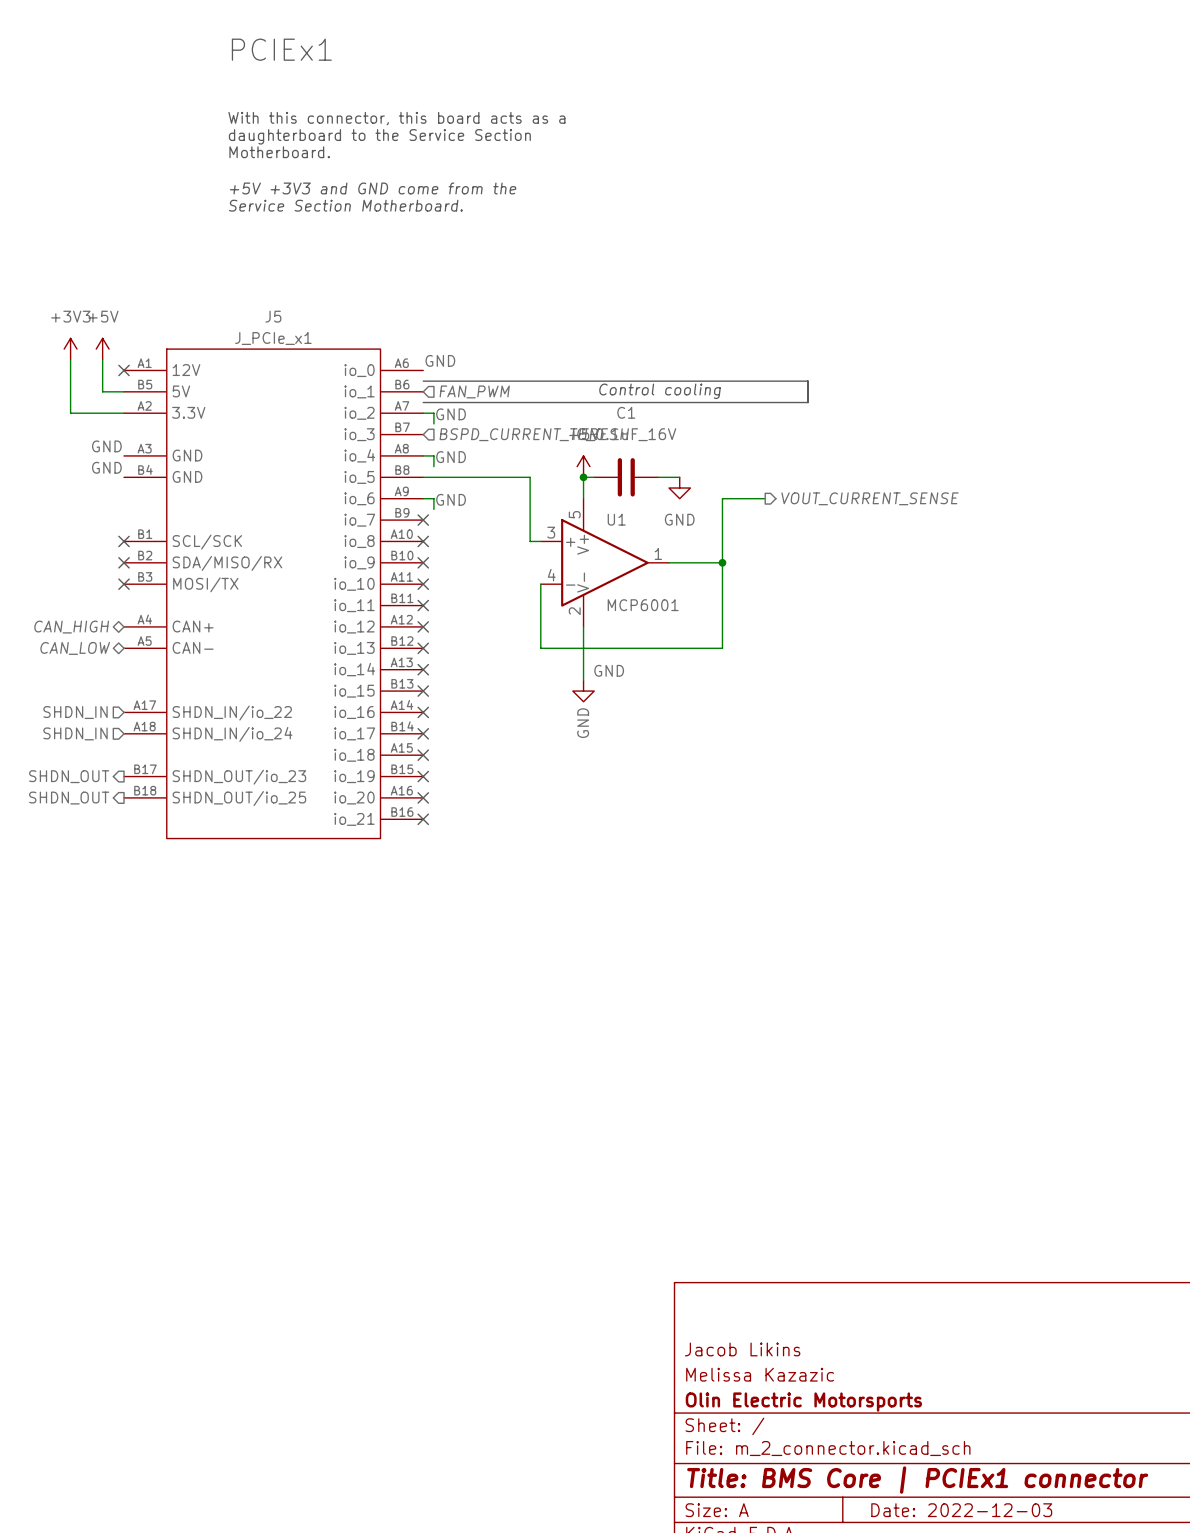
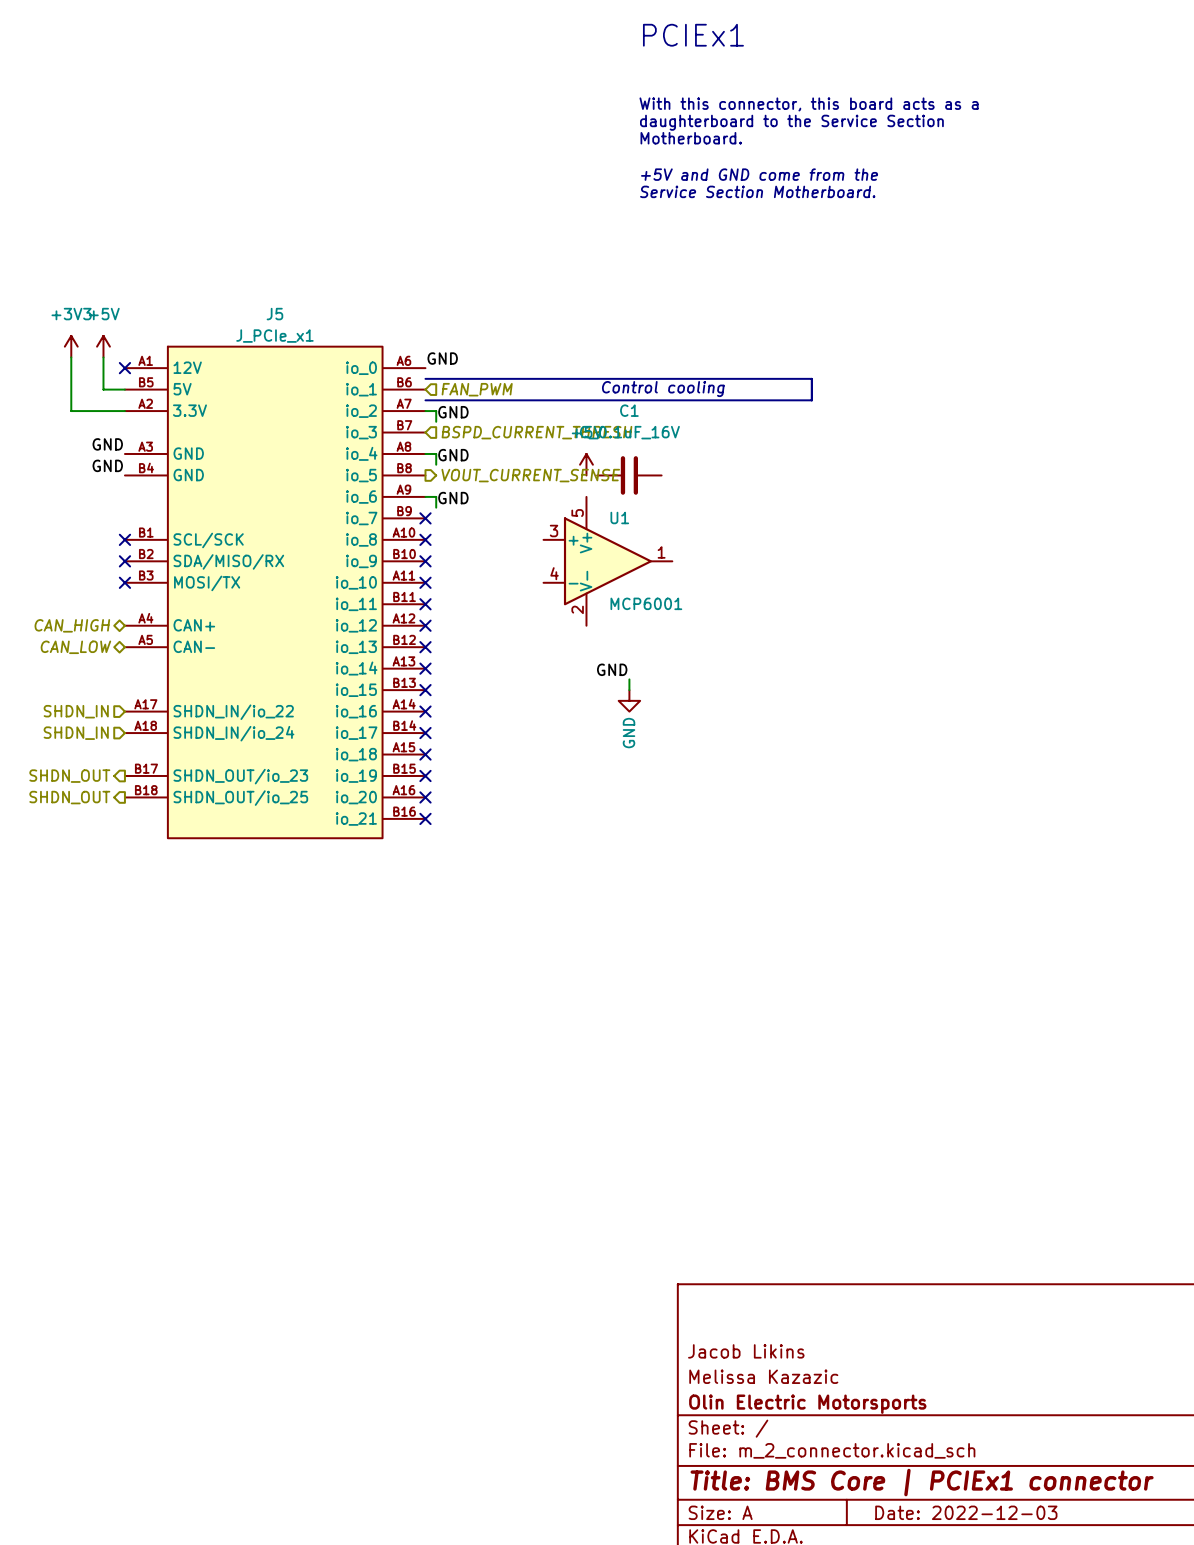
text: none -> PCIEx1 (693, 35)
text: PCIEx1 (281, 49) -> none
text: none -> With this connector, this board acts as a (809, 104)
text: With this connector, this board acts as a (396, 118) -> none
text: none -> daughterboard to the Service Section (791, 122)
text: daughterboard to the Service Section (379, 136) -> none
text: none -> Motherboard. (691, 138)
text: Motherboard. (279, 152) -> none
text: none -> +5V and GND come from the (759, 174)
text: +5V +3V3 and GND come from the (373, 188) -> none
text: none -> Service Section Motherboard. (757, 191)
text: Service Section Motherboard. (345, 205) -> none
wire: (423, 477) (530, 477) (530, 541) (540, 541) -> none
hierarchical label: none -> VOUT_CURRENT_SENSE (530, 475)
junction: (583, 477) -> none
wire: (594, 477) (583, 477) (583, 498) -> none
wire: (658, 477) (679, 477) -> none
power symbol: GND (679, 488) -> none
wire: (765, 498) (722, 498) (722, 648) (540, 648) (540, 584) -> none
hierarchical label: VOUT_CURRENT_SENSE (870, 498) -> none
wire: (669, 562) (722, 562) -> none
junction: (722, 562) -> none
wire: (583, 626) (583, 680) -> none
wire: none -> (629, 679) (629, 690)
power symbol position: GND (583, 691) -> GND (629, 700)

